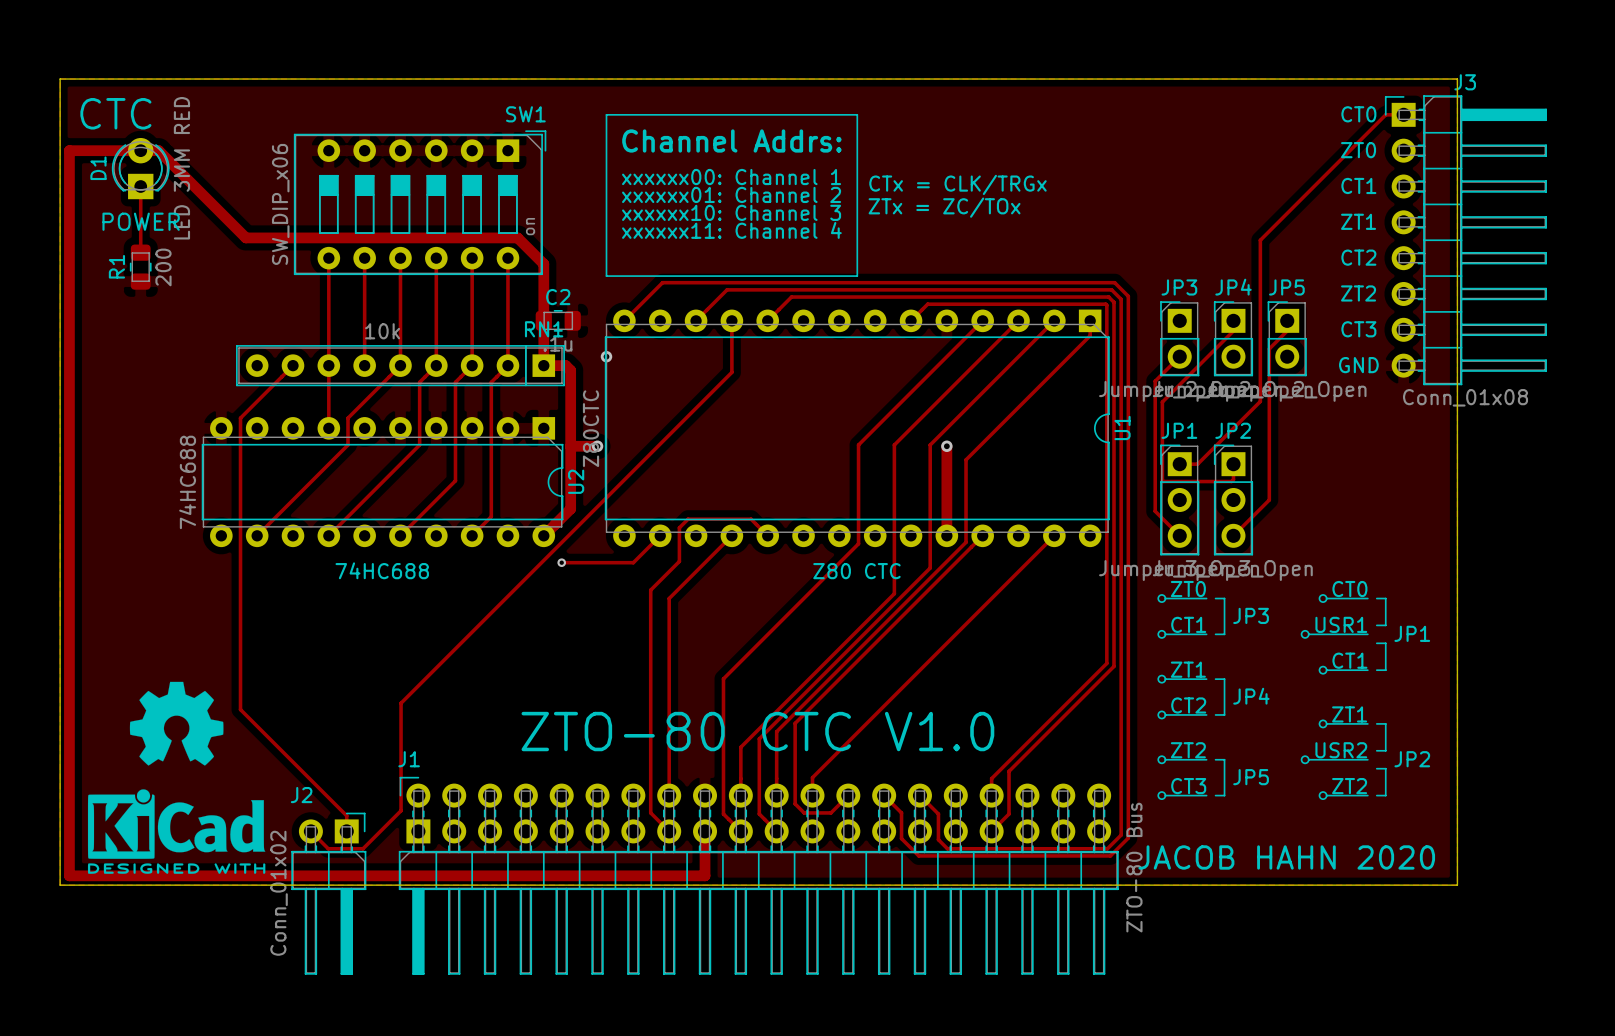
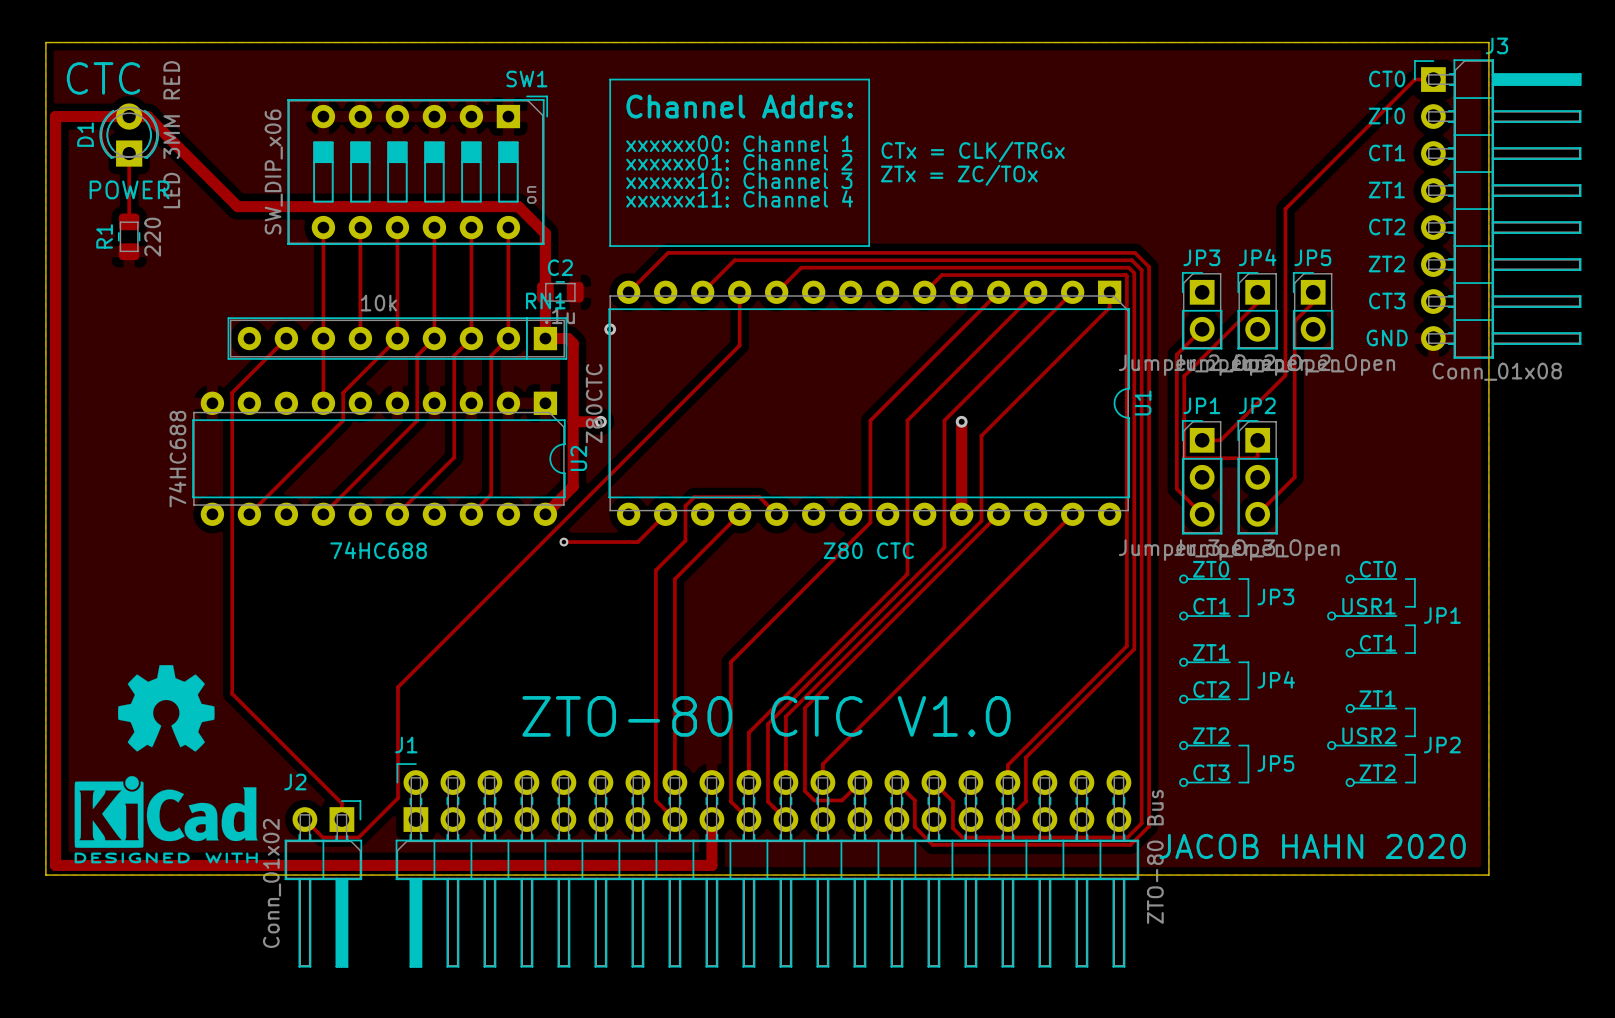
R1 value: 200 (163, 267) -> 220 (152, 237)

